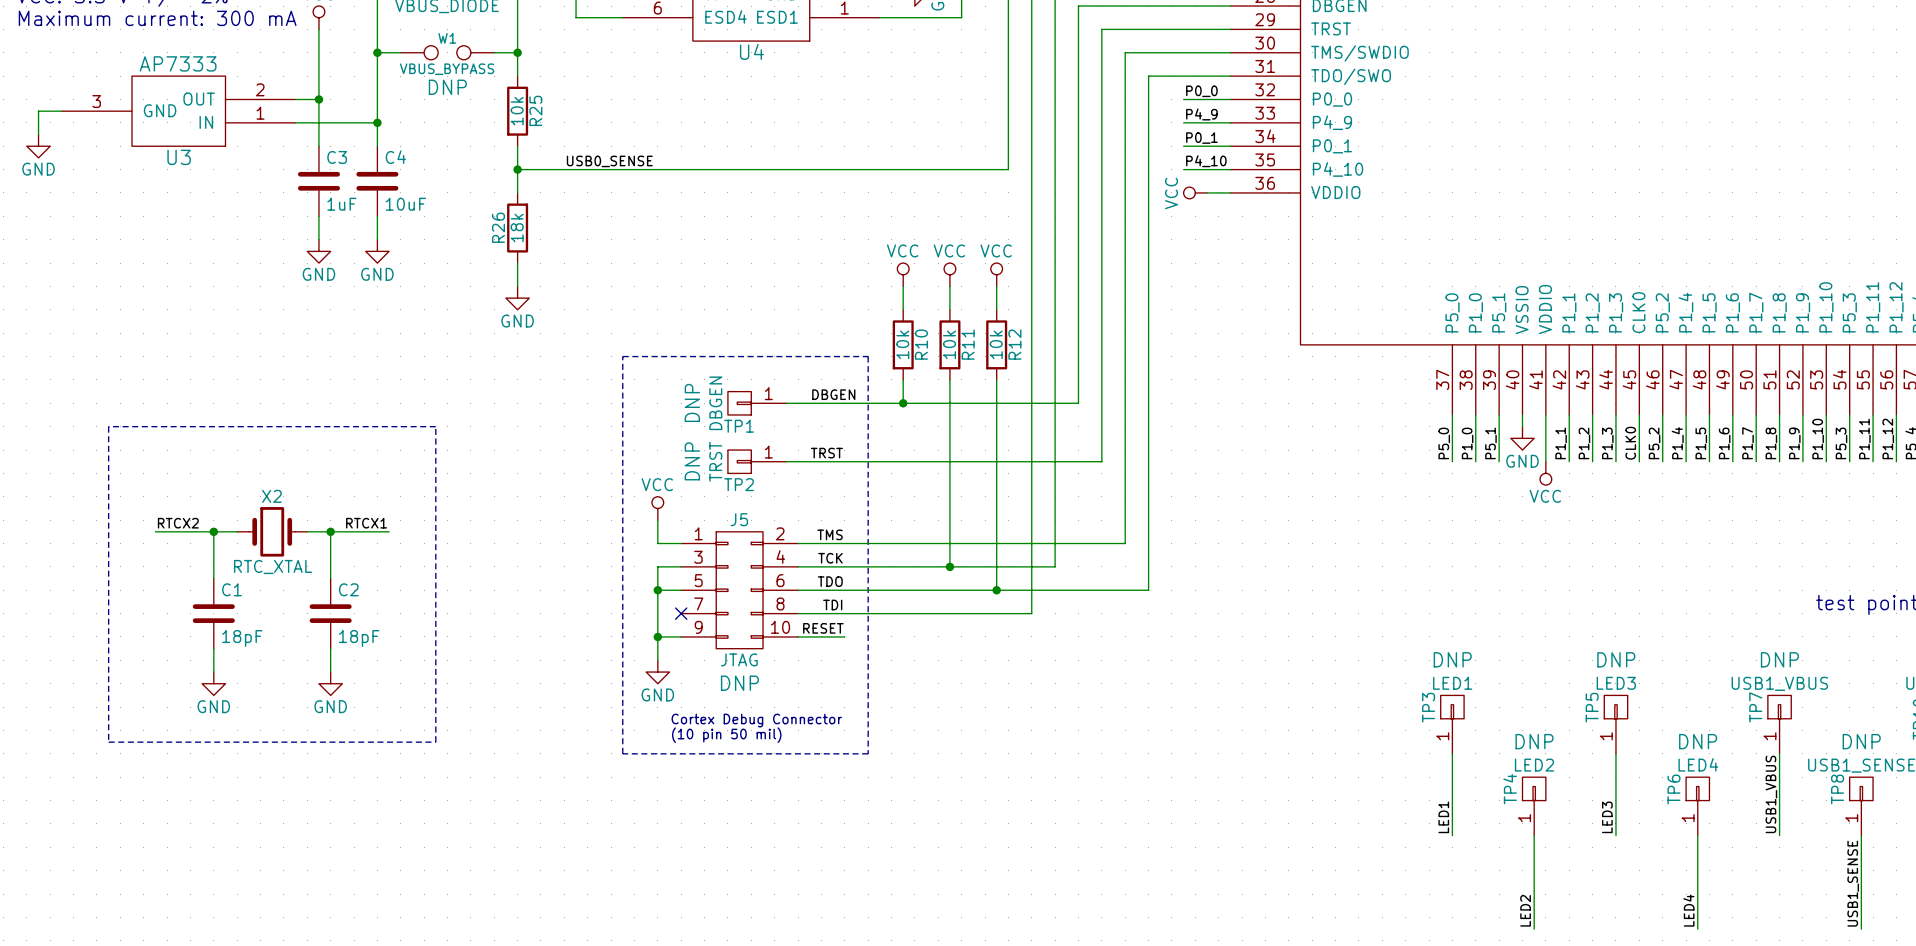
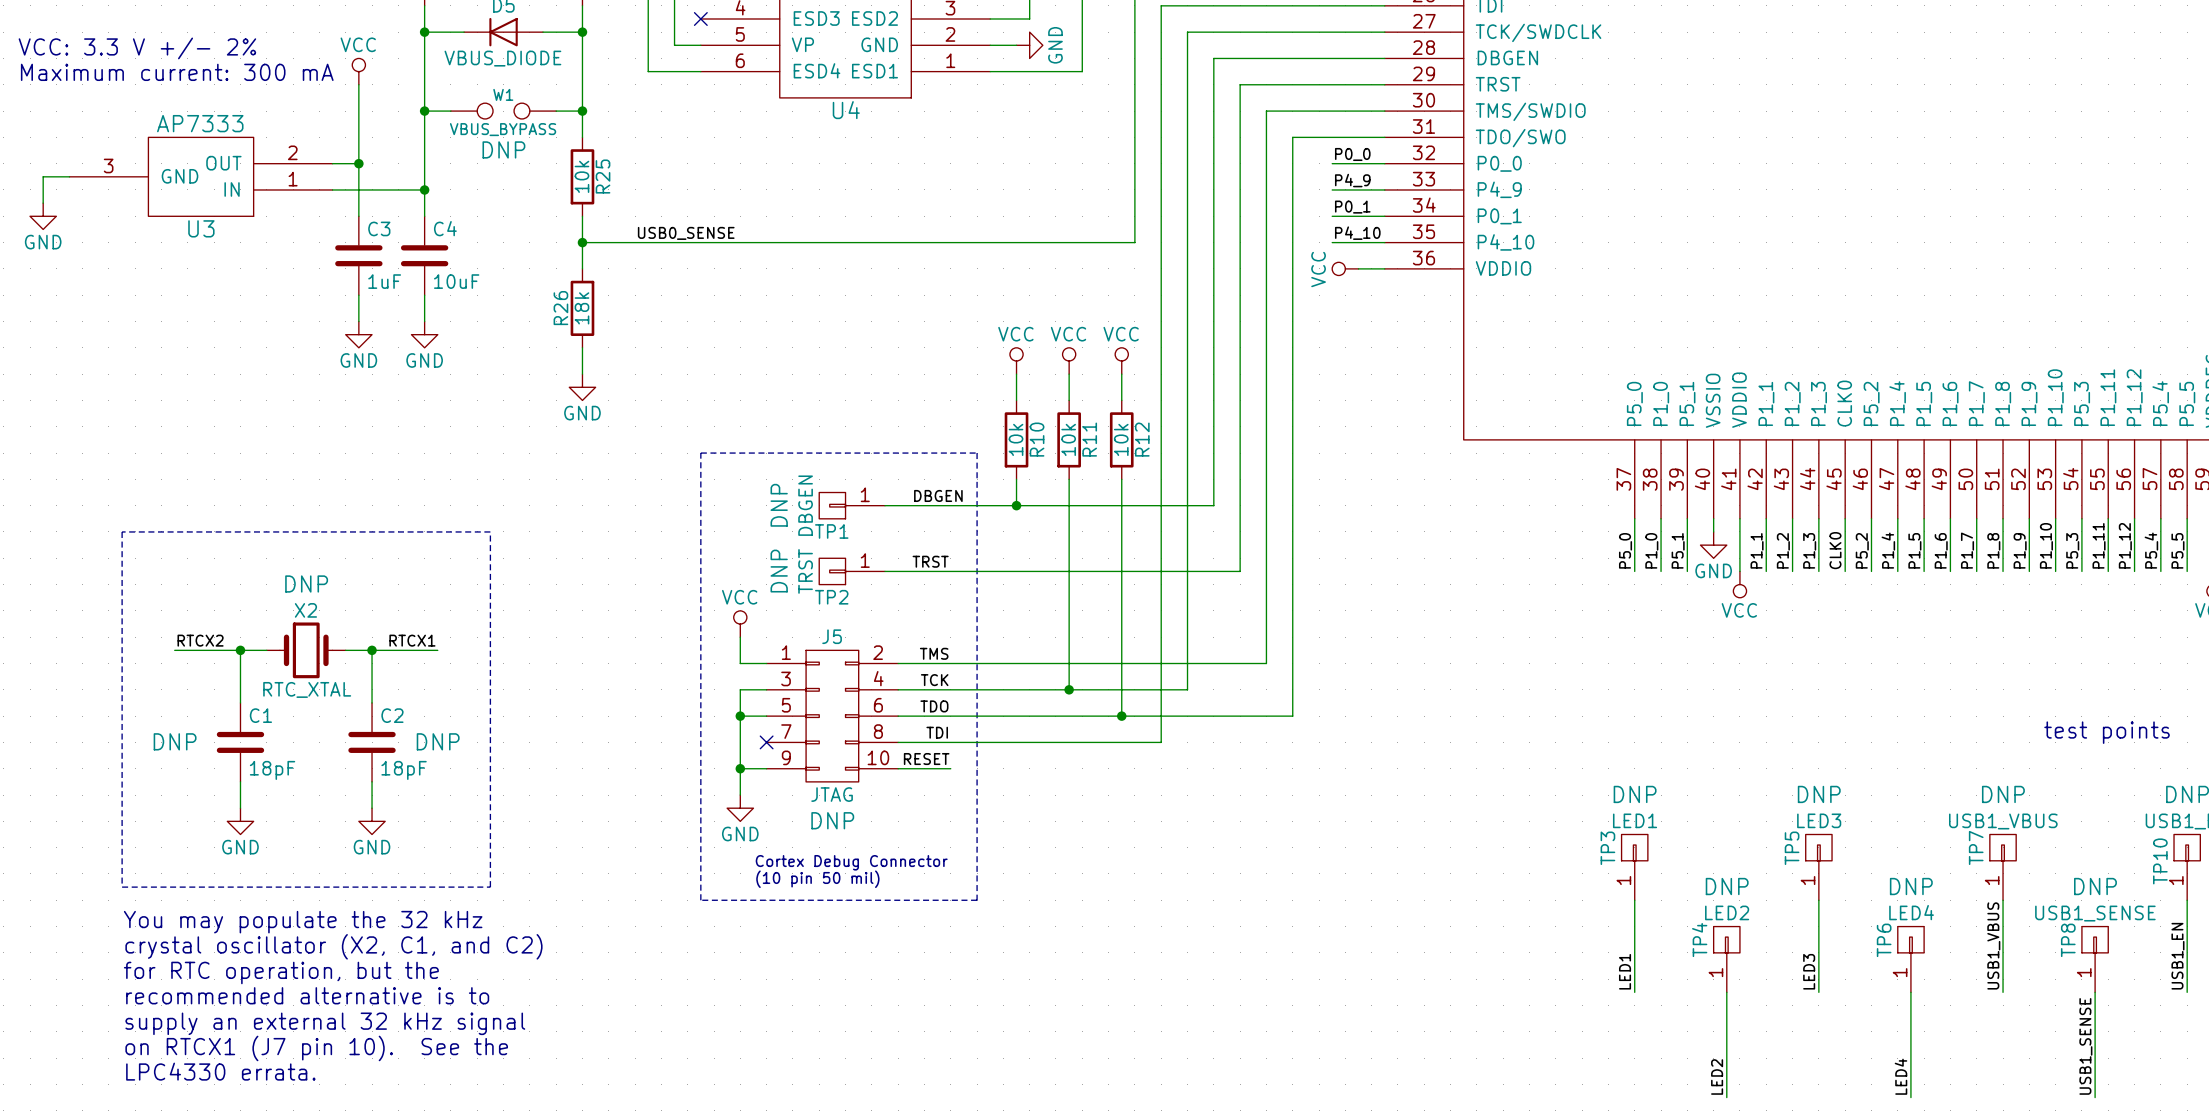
X2 text: none -> DNP (306, 583)
C1 text: none -> DNP (175, 741)
C2 text: none -> DNP (438, 741)
text: none -> You may populate the 32 kHz (303, 922)
text: none -> crystal oscillator (X2, C1, and C2) (333, 946)
text: none -> for RTC operation, but the (281, 972)
text: none -> recommended alternative is to (307, 995)
text: none -> supply an external 32 kHz signal (325, 1023)
text: none -> on RTCX1 (J7 pin 10). See the (316, 1048)
text: none -> LPC4330 errata. (220, 1071)

